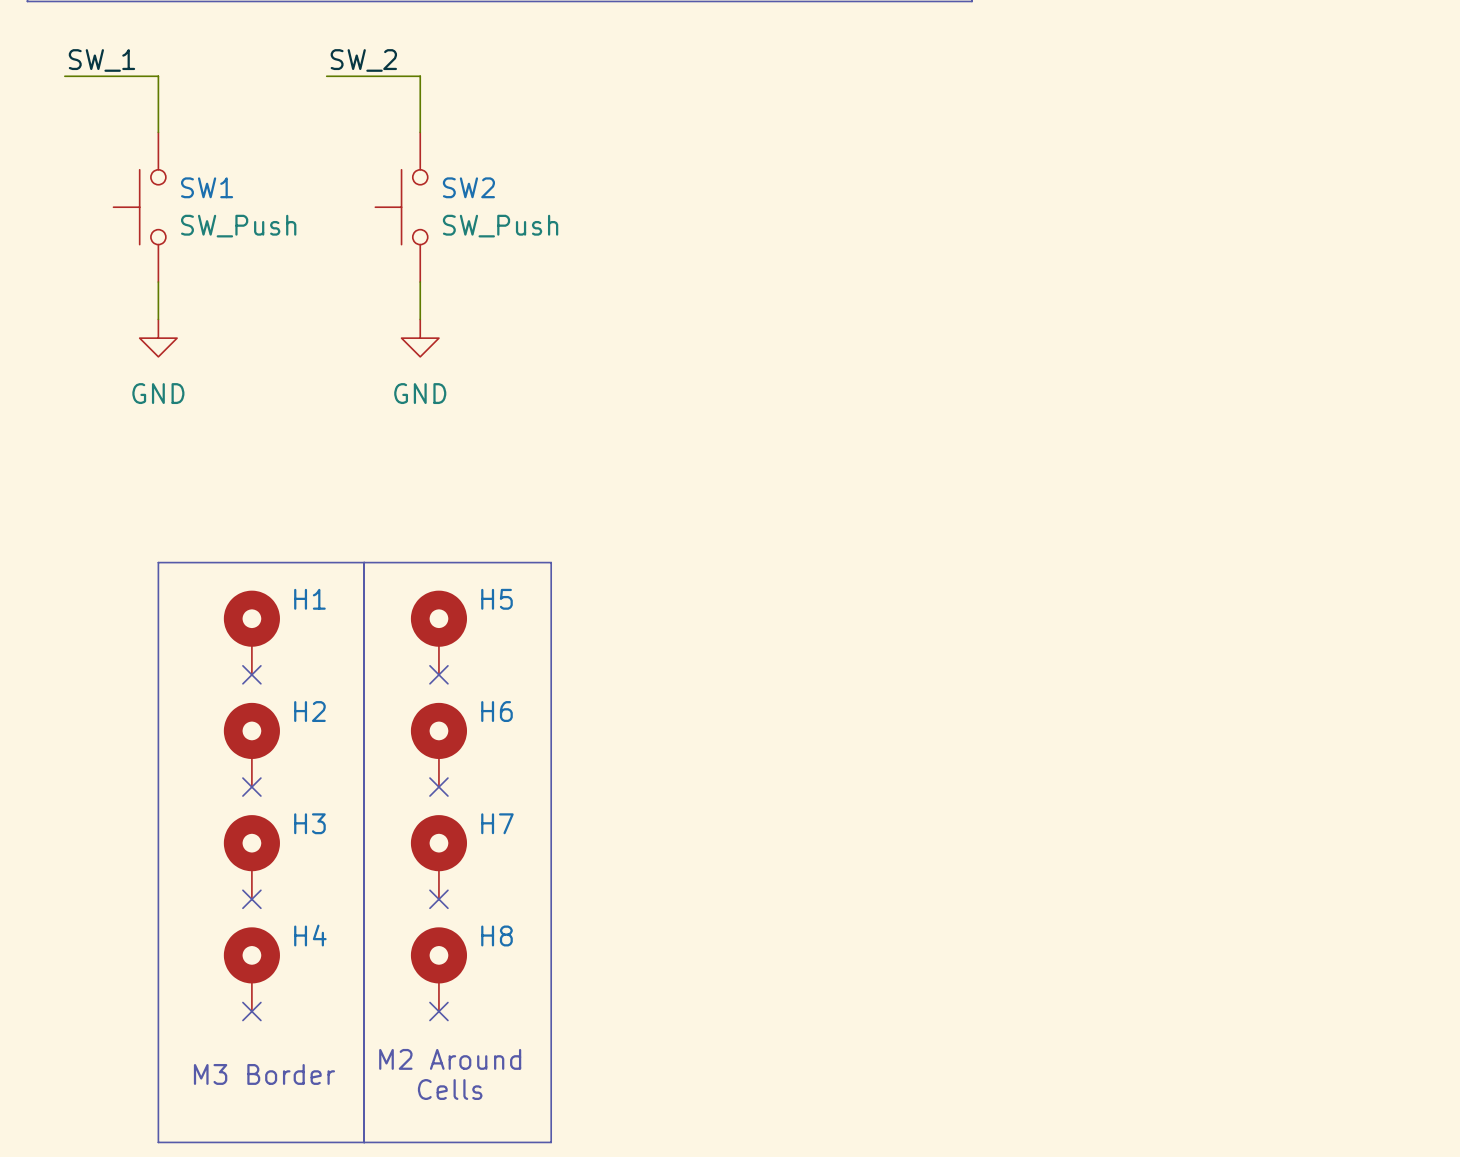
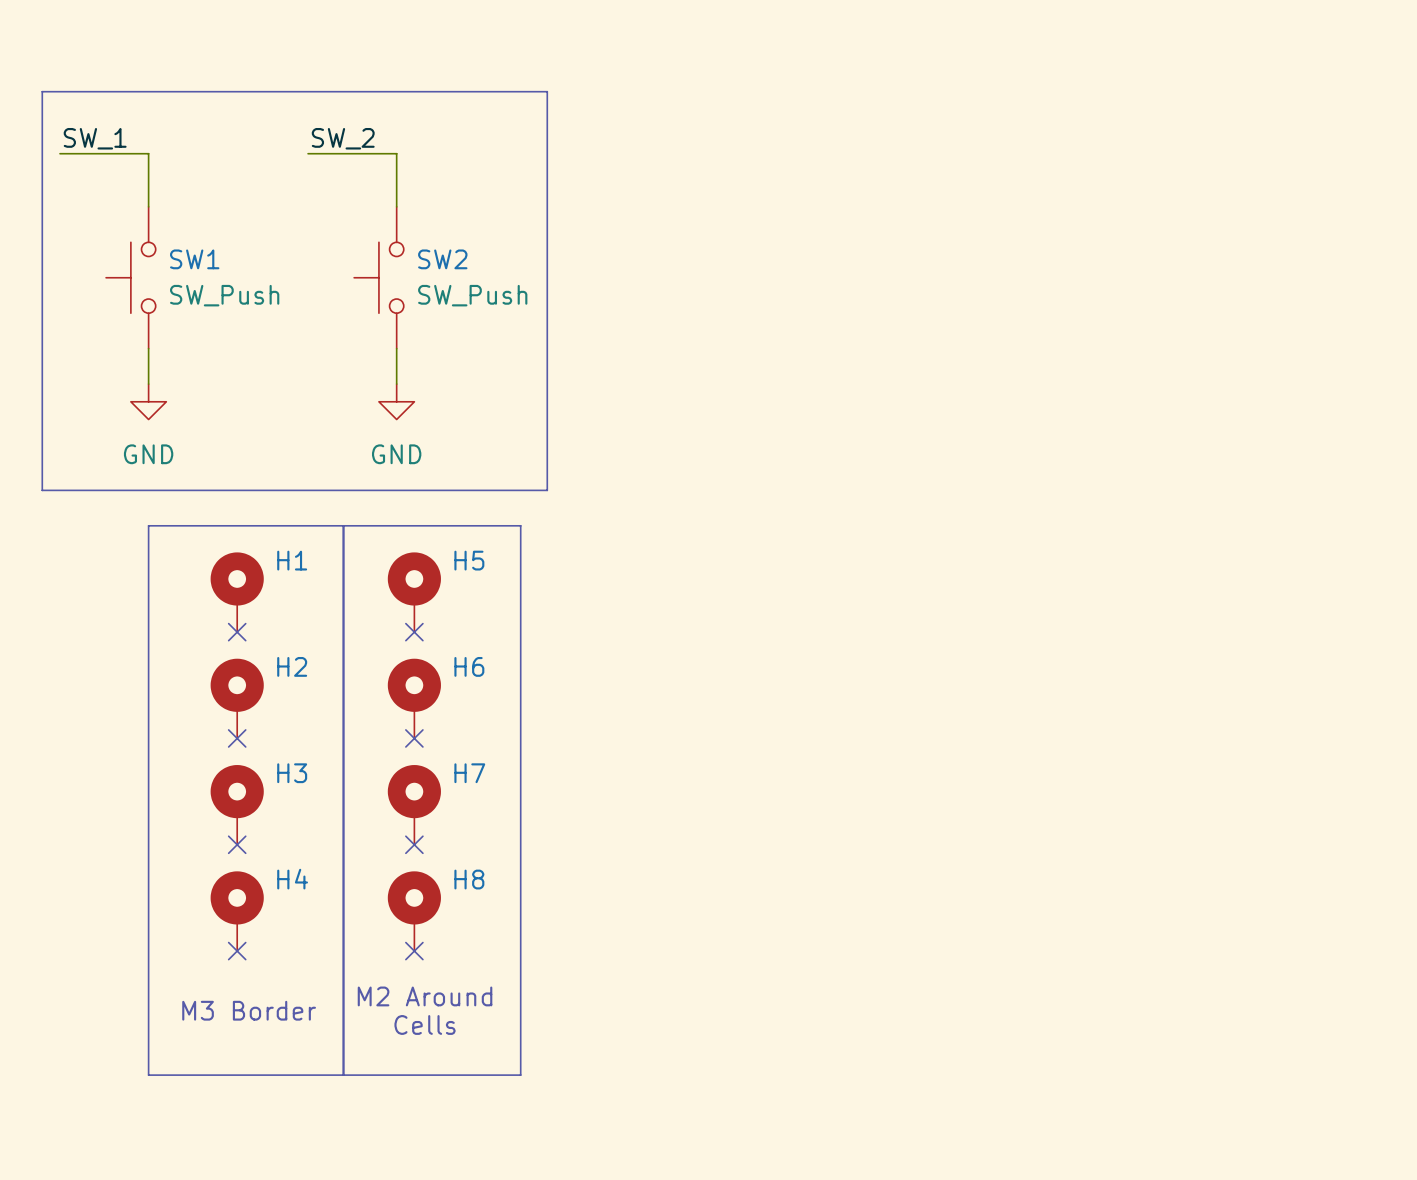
label position: SW_1 (101, 60) -> SW_1 (95, 138)
label position: SW_2 (363, 60) -> SW_2 (343, 138)
wire: (64, 76) (158, 76) (158, 132) -> (60, 153) (148, 153) (148, 206)
wire: (326, 76) (420, 76) (420, 132) -> (308, 153) (396, 153) (396, 206)
line: none -> (42, 91) (547, 91) (547, 490) (42, 490) (42, 91)
SW1 position: (139, 207) -> (130, 277)
SW2 position: (401, 207) -> (378, 277)
wire: (158, 282) (158, 319) -> (148, 348) (148, 384)
wire: (420, 282) (420, 319) -> (396, 348) (396, 384)
power symbol position: GND (158, 338) -> GND (148, 401)
power symbol position: GND (420, 338) -> GND (396, 401)

